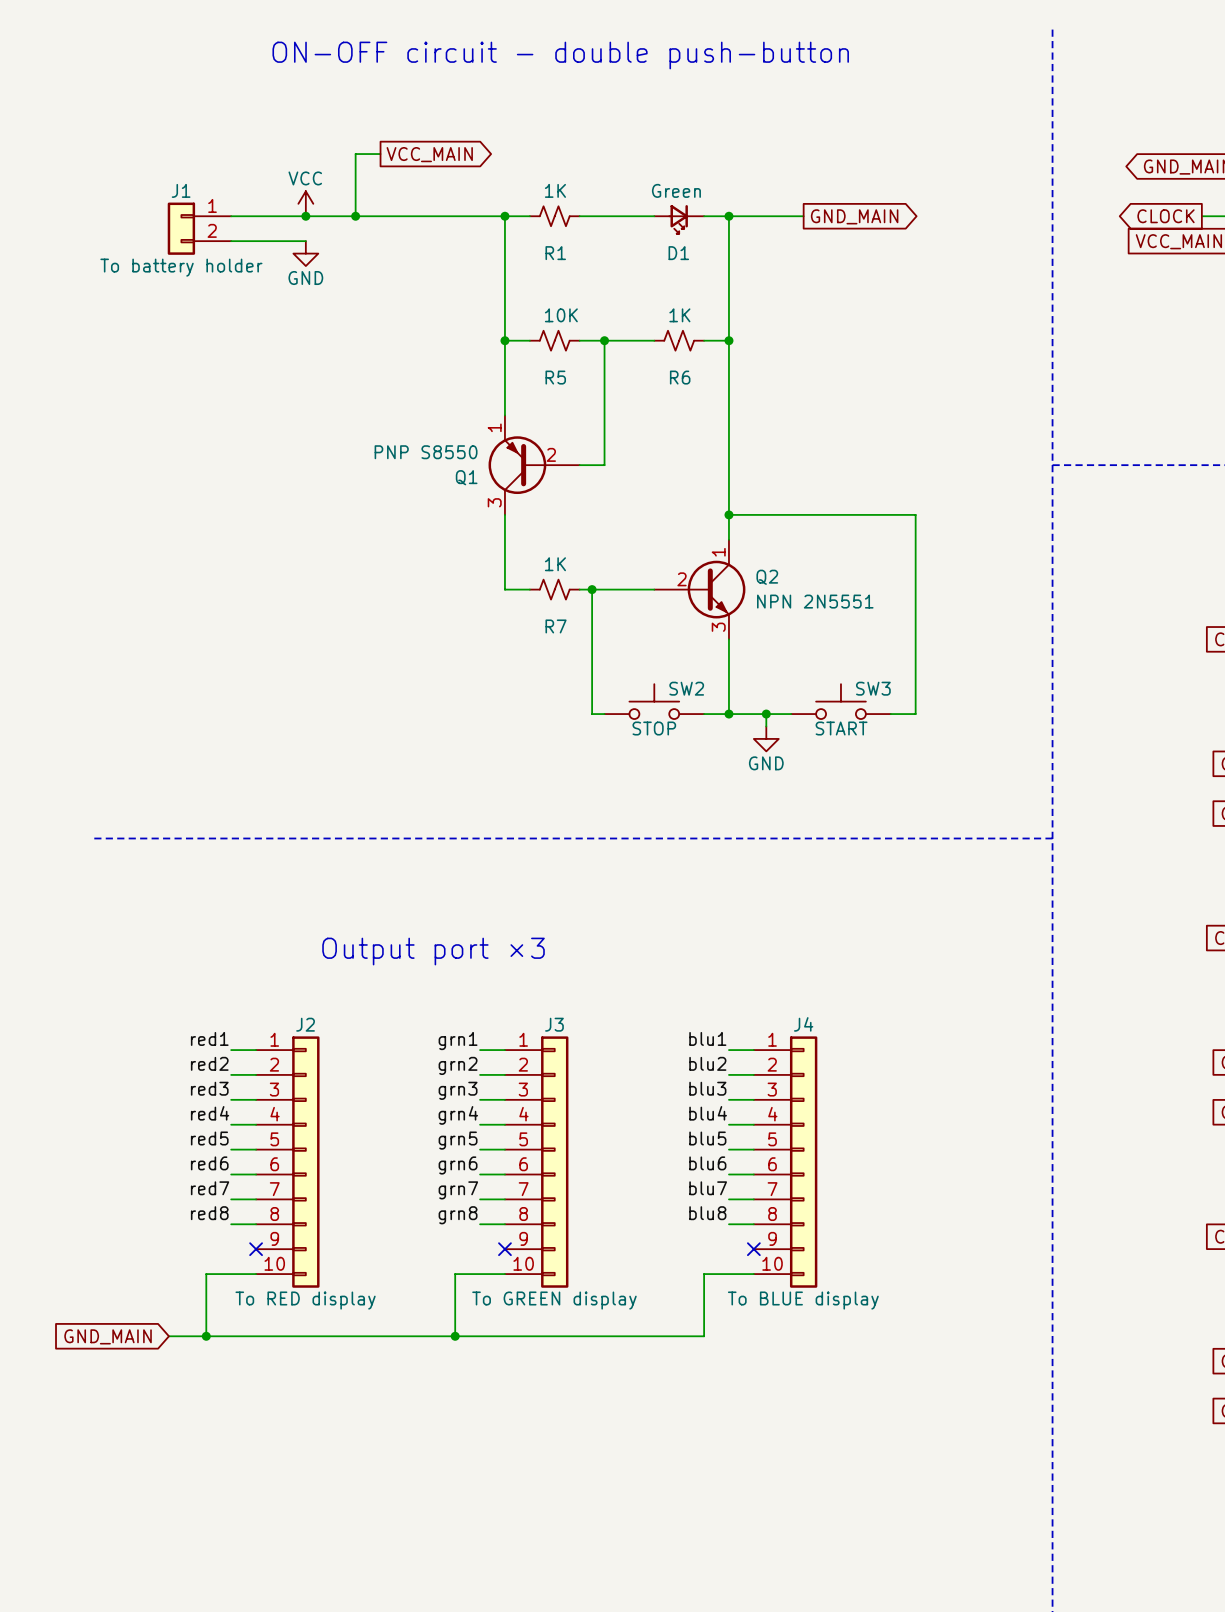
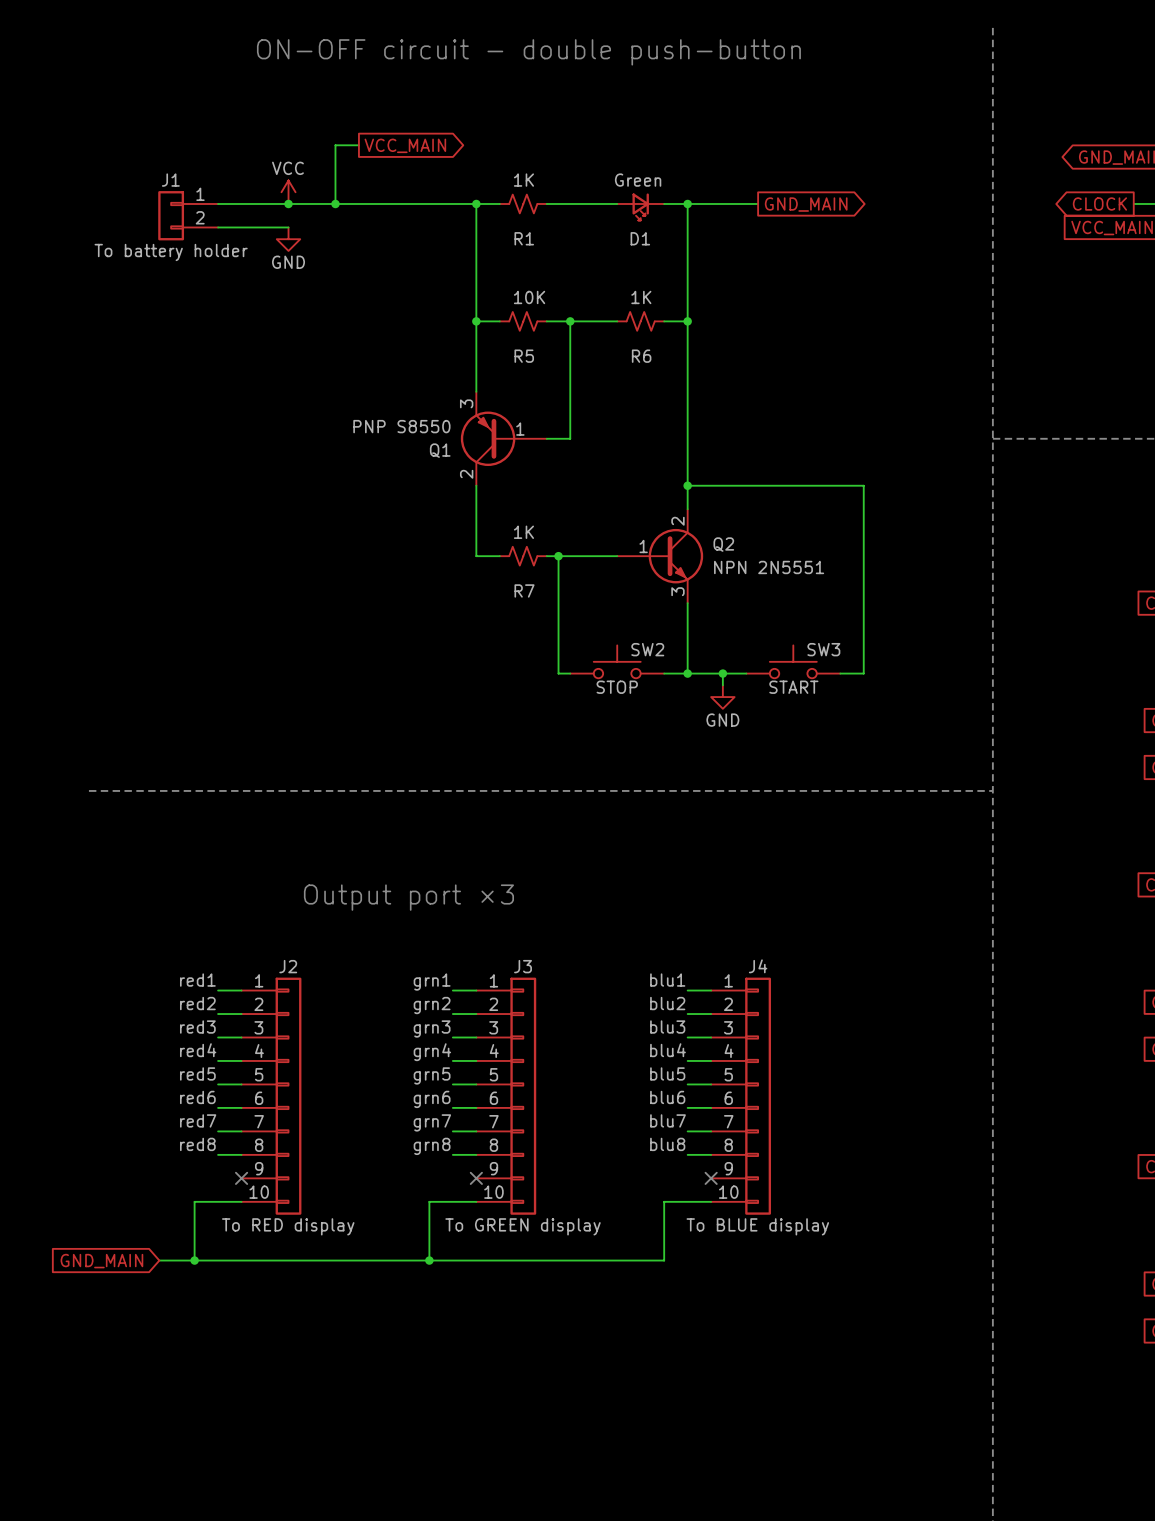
Q1 pin number: 1 (494, 427) -> 3 (466, 403)
Q1 pin number: 2 (551, 454) -> 1 (520, 429)
Q1 pin number: 3 (494, 502) -> 2 (466, 474)
Q2 pin number: 1 (718, 552) -> 2 (677, 521)
Q2 pin number: 2 (682, 579) -> 1 (643, 546)

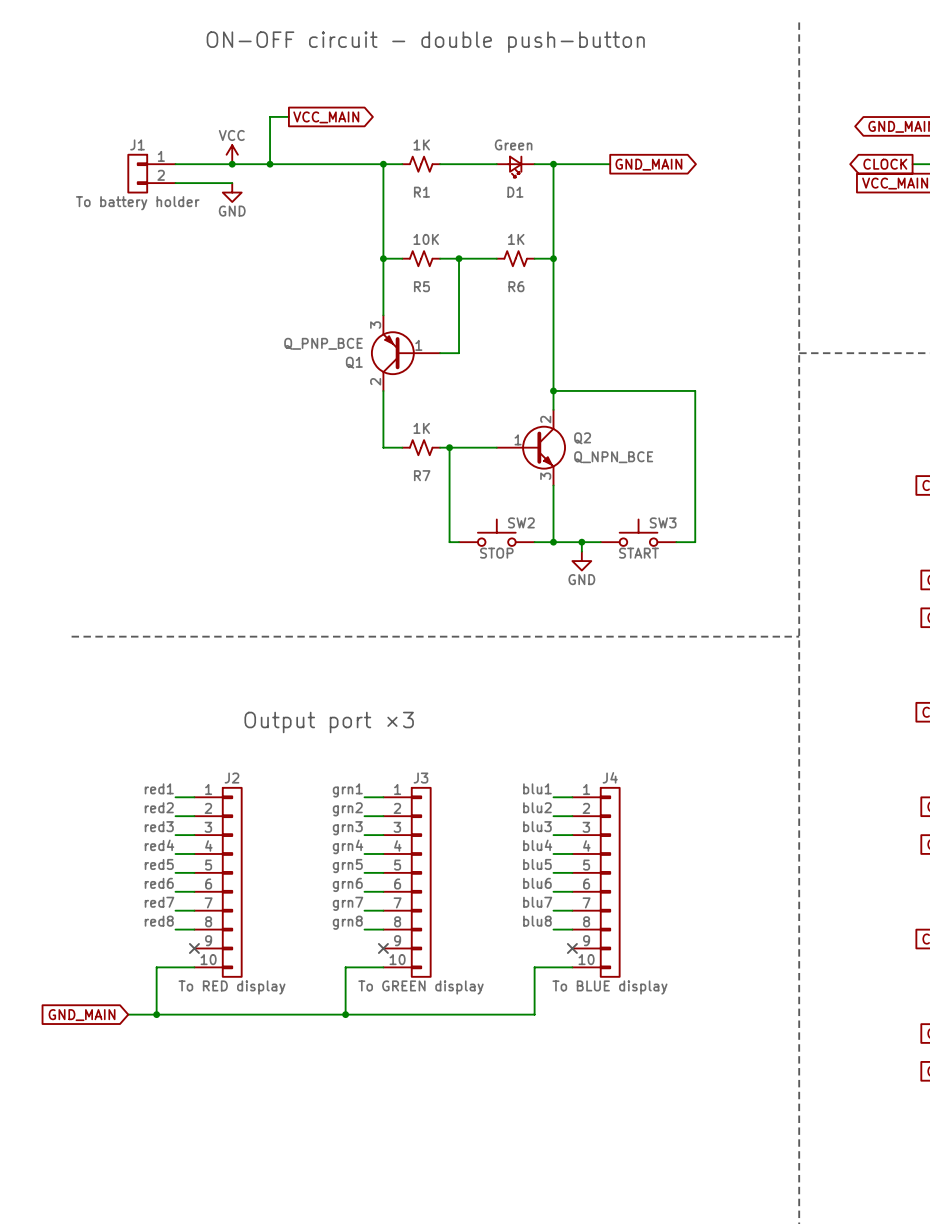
Q1 value: PNP S8550 (401, 426) -> Q_PNP_BCE (323, 343)
Q2 value: NPN 2N5551 (769, 567) -> Q_NPN_BCE (613, 457)

